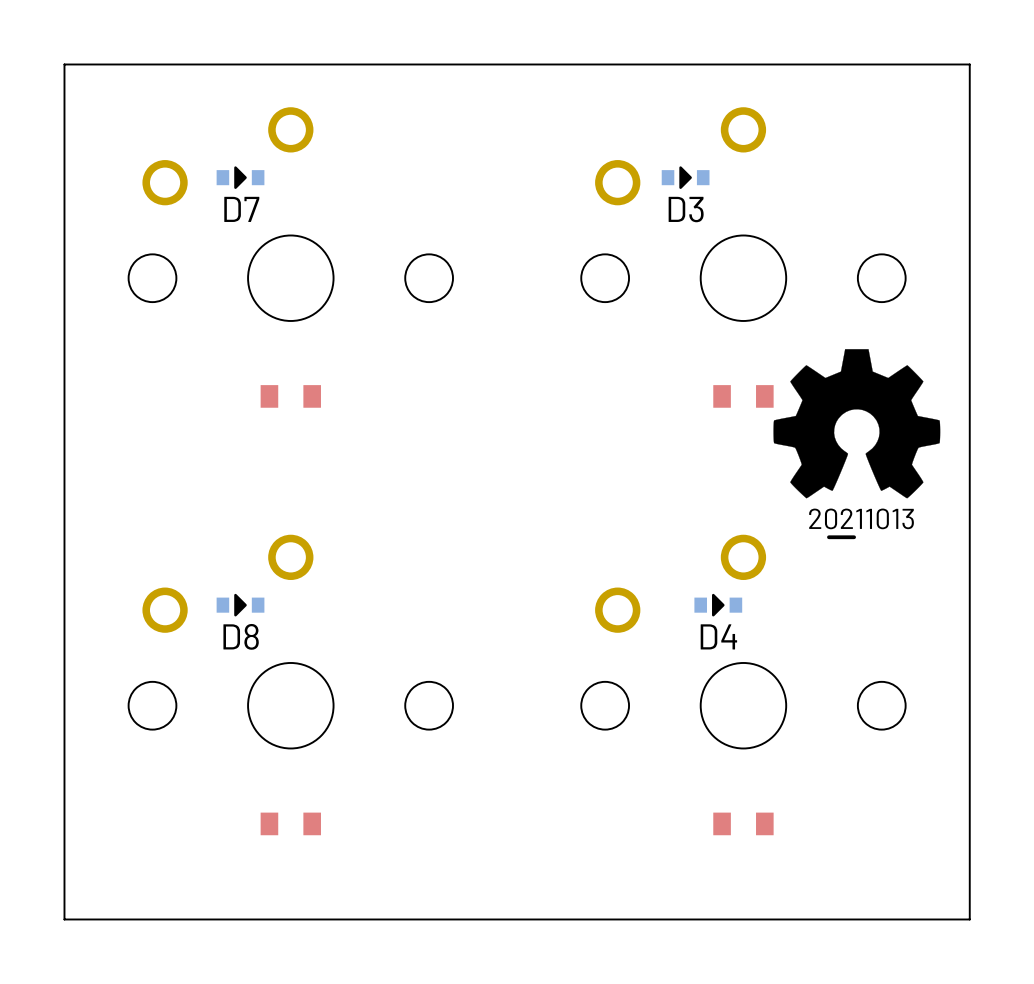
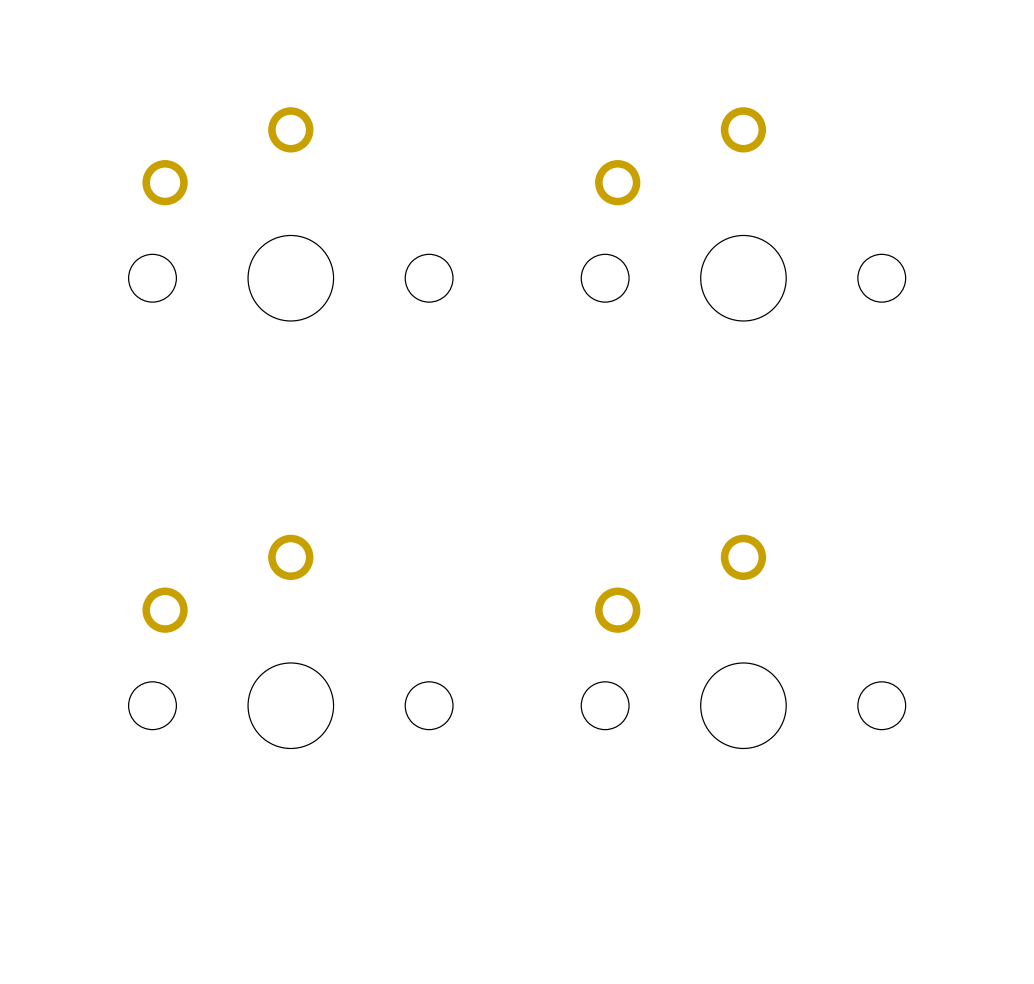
board edge: (969, 64) (64, 64) (64, 919) (969, 919) (969, 64) -> none
D7: (240, 177) -> none
D3: (685, 177) -> none
drawing: [773, 349, 941, 540] -> none
part: (290, 396) -> none
part: (743, 396) -> none
D8: (240, 605) -> none
D4: (718, 605) -> none
part: (290, 823) -> none
part: (743, 823) -> none

